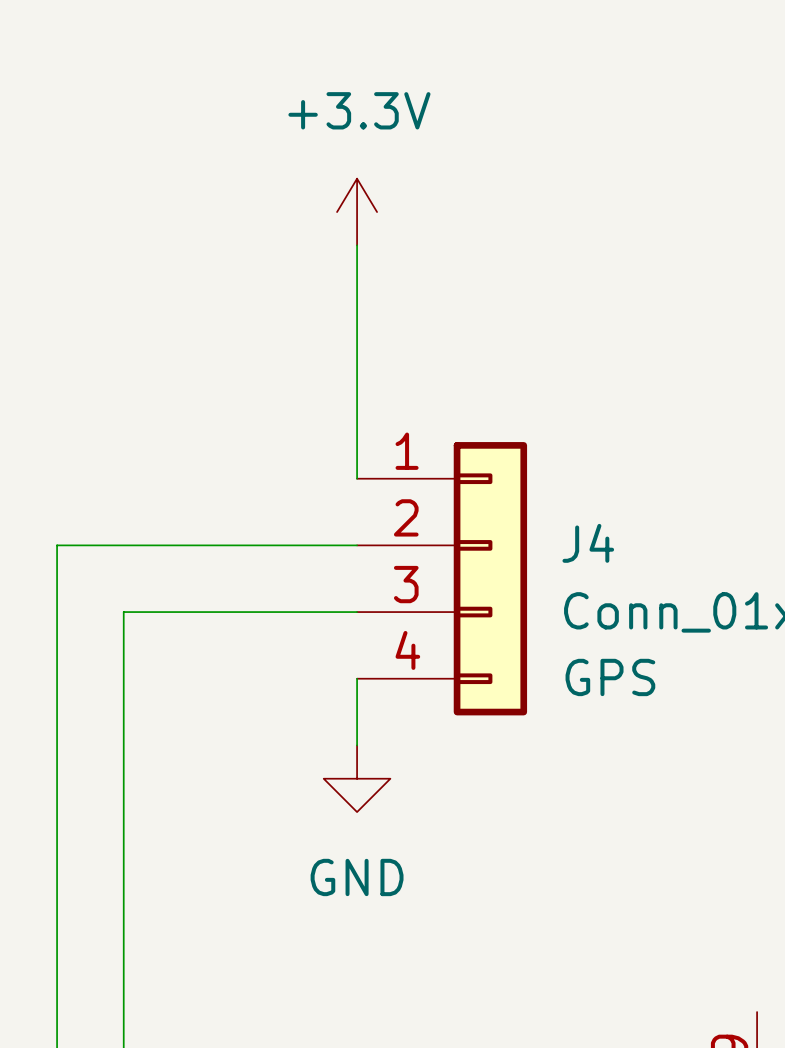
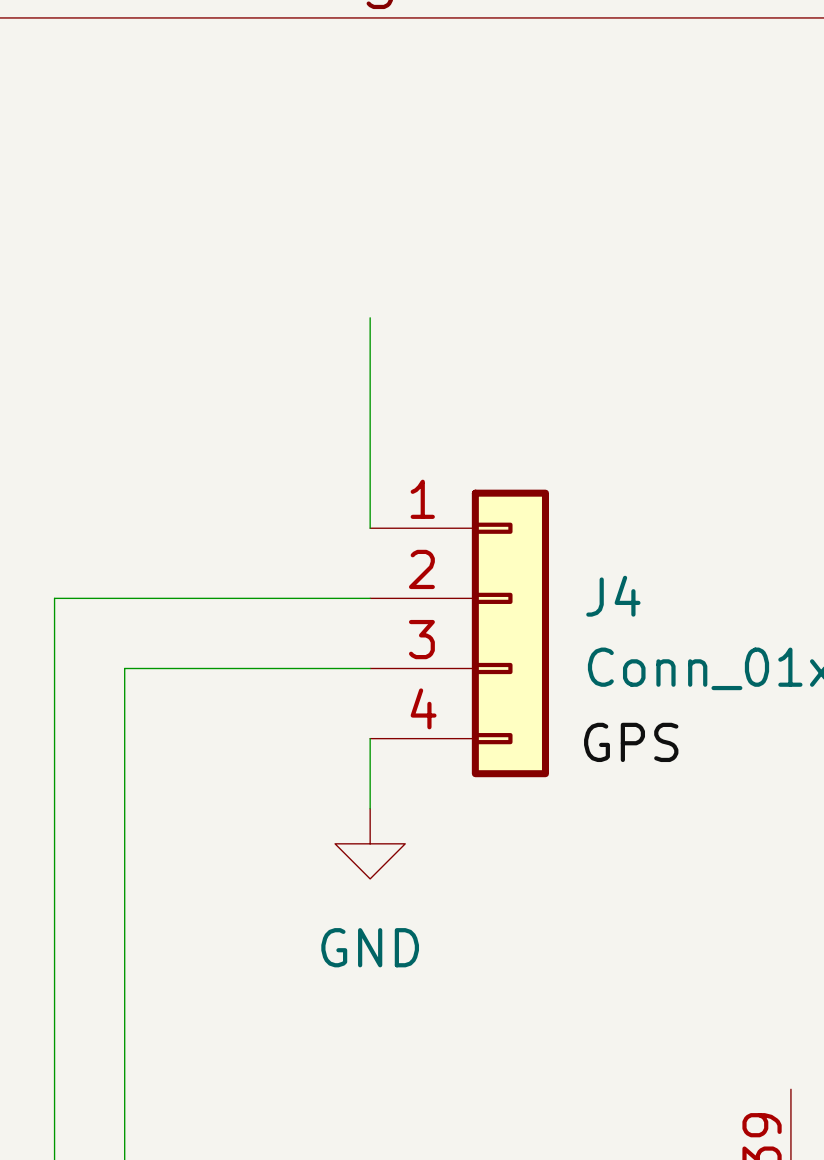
power symbol: +3.3V (357, 212) -> none
wire: (357, 245) (357, 278) -> none
J4 text: GPS (610, 677) -> none
label: none -> GPS (631, 742)

